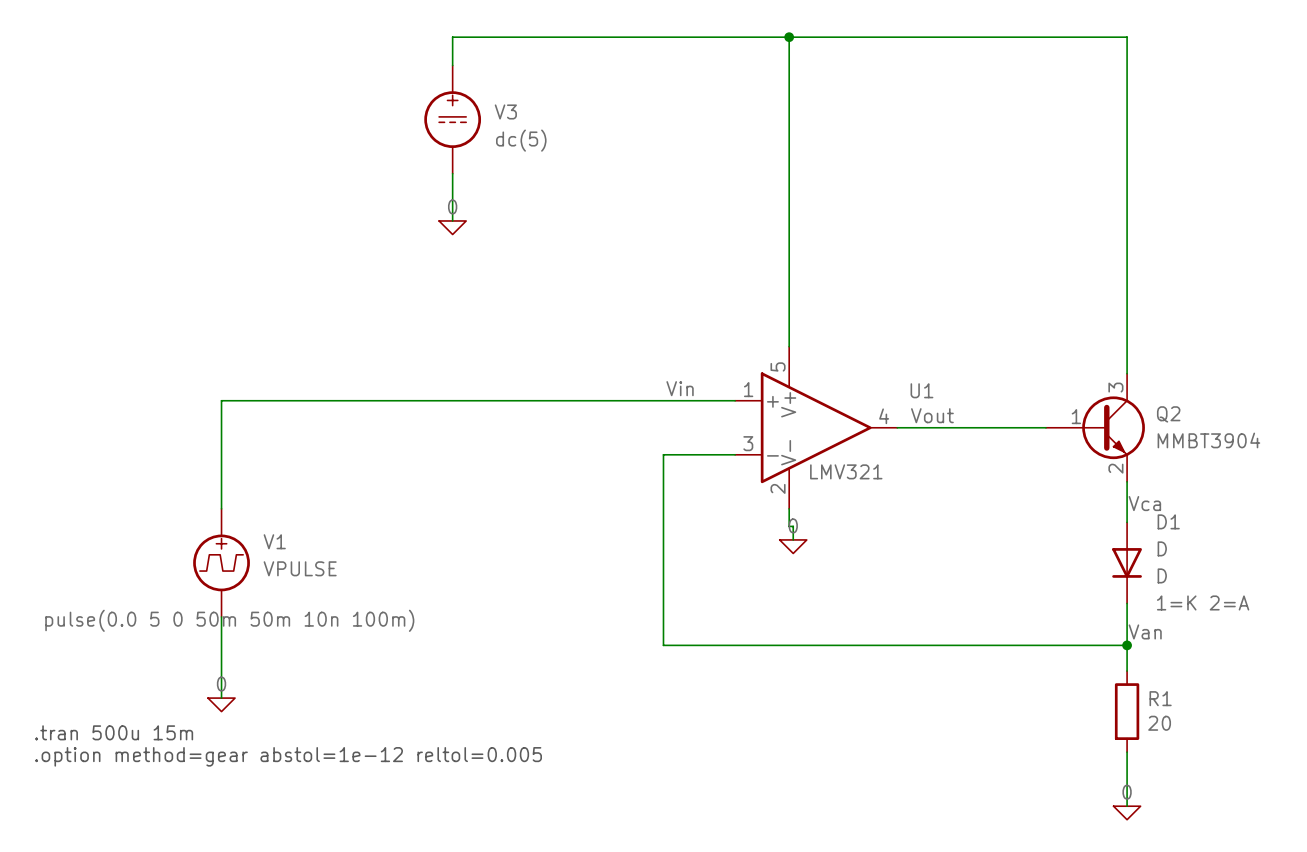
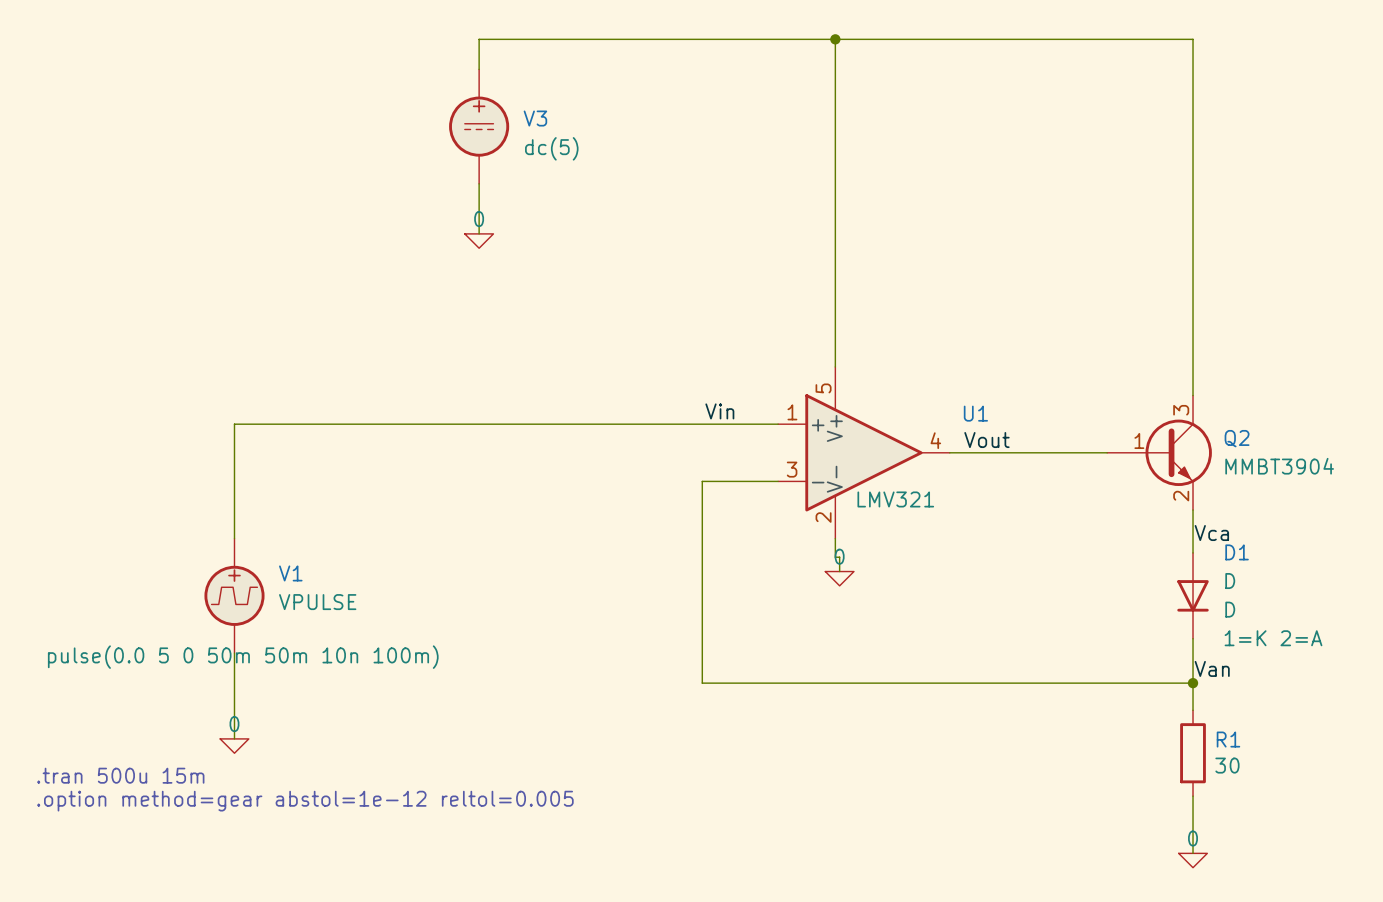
R1 value: 20 (1159, 723) -> 30 (1227, 765)

